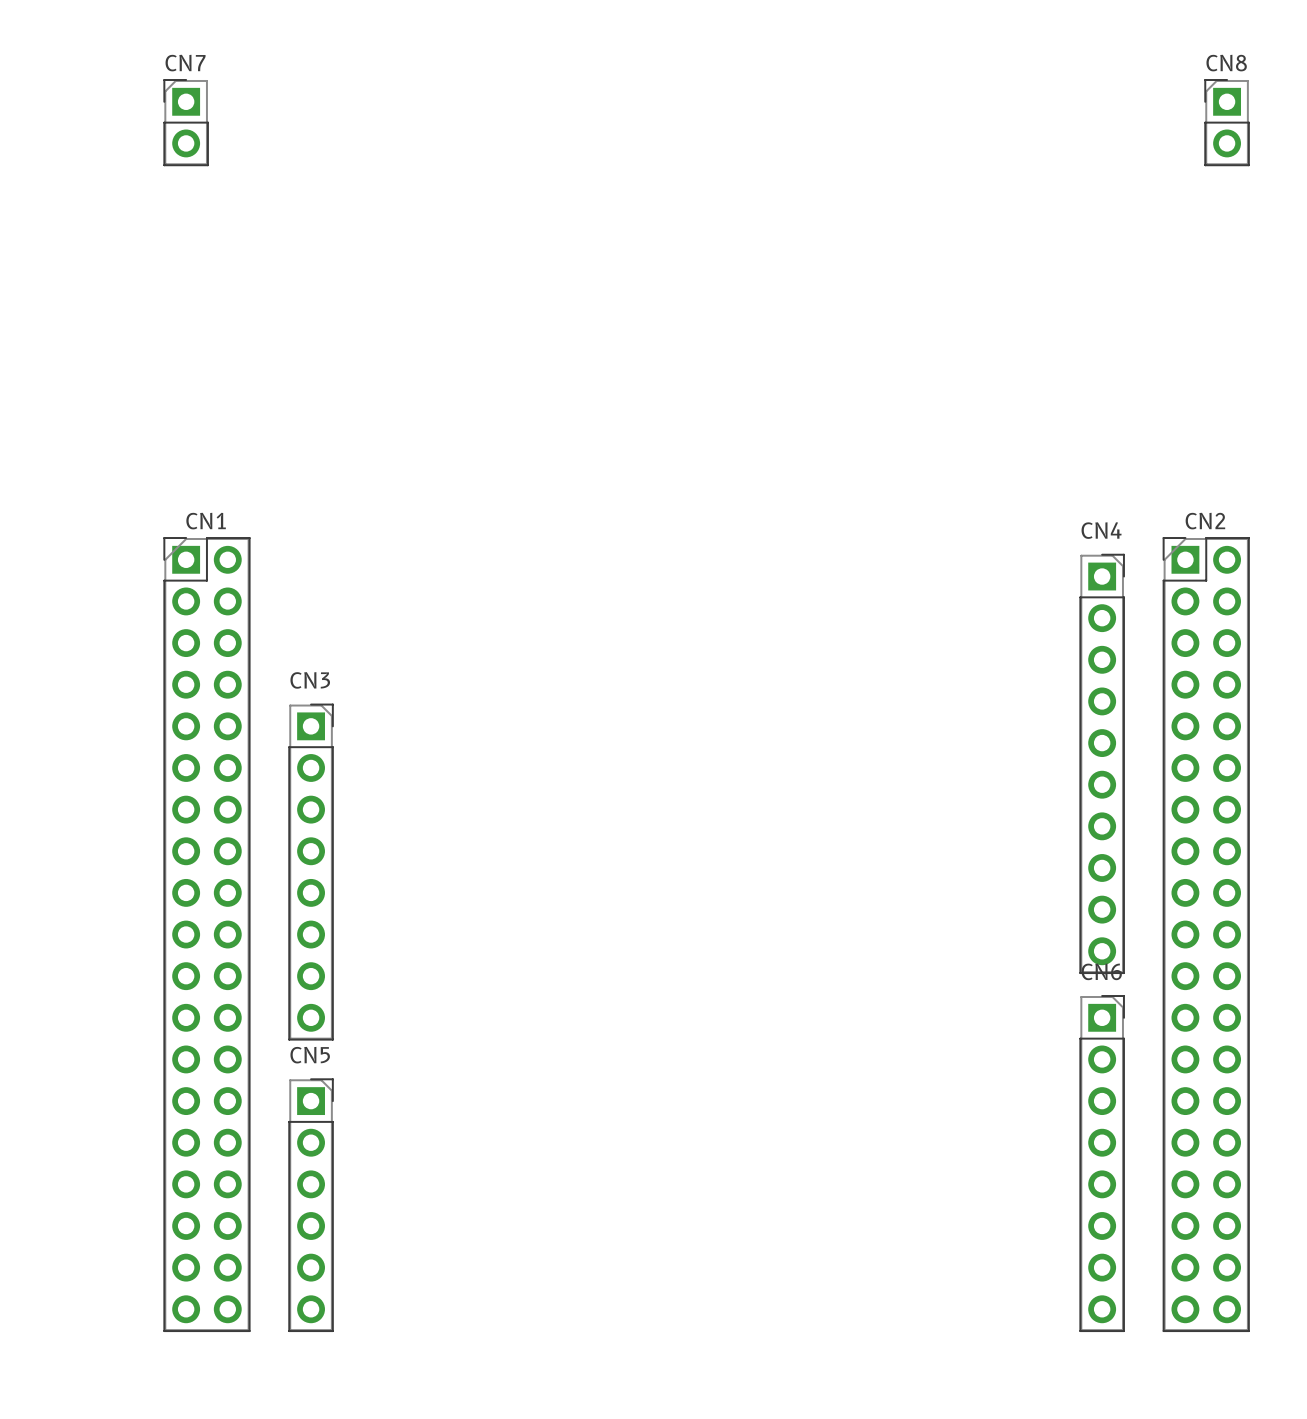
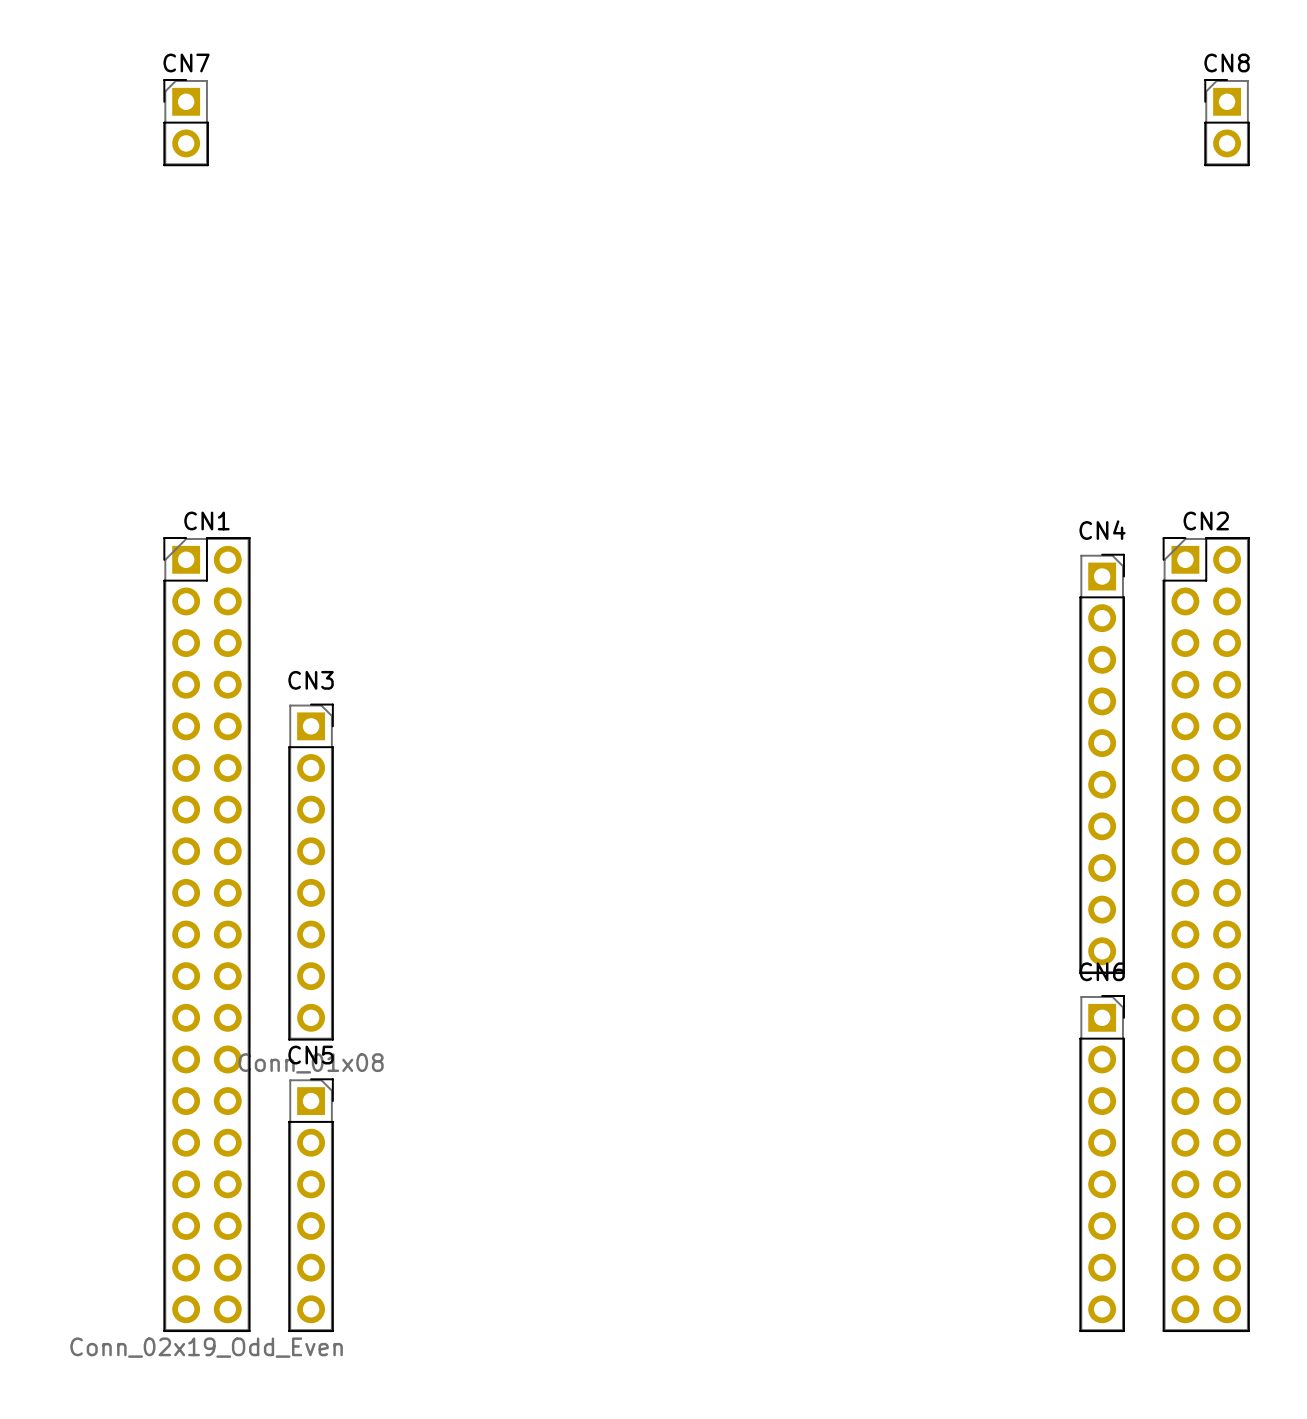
CN3 value: none -> Conn_01x08 (311, 1063)
CN1 value: none -> Conn_02x19_Odd_Even (206, 1347)

